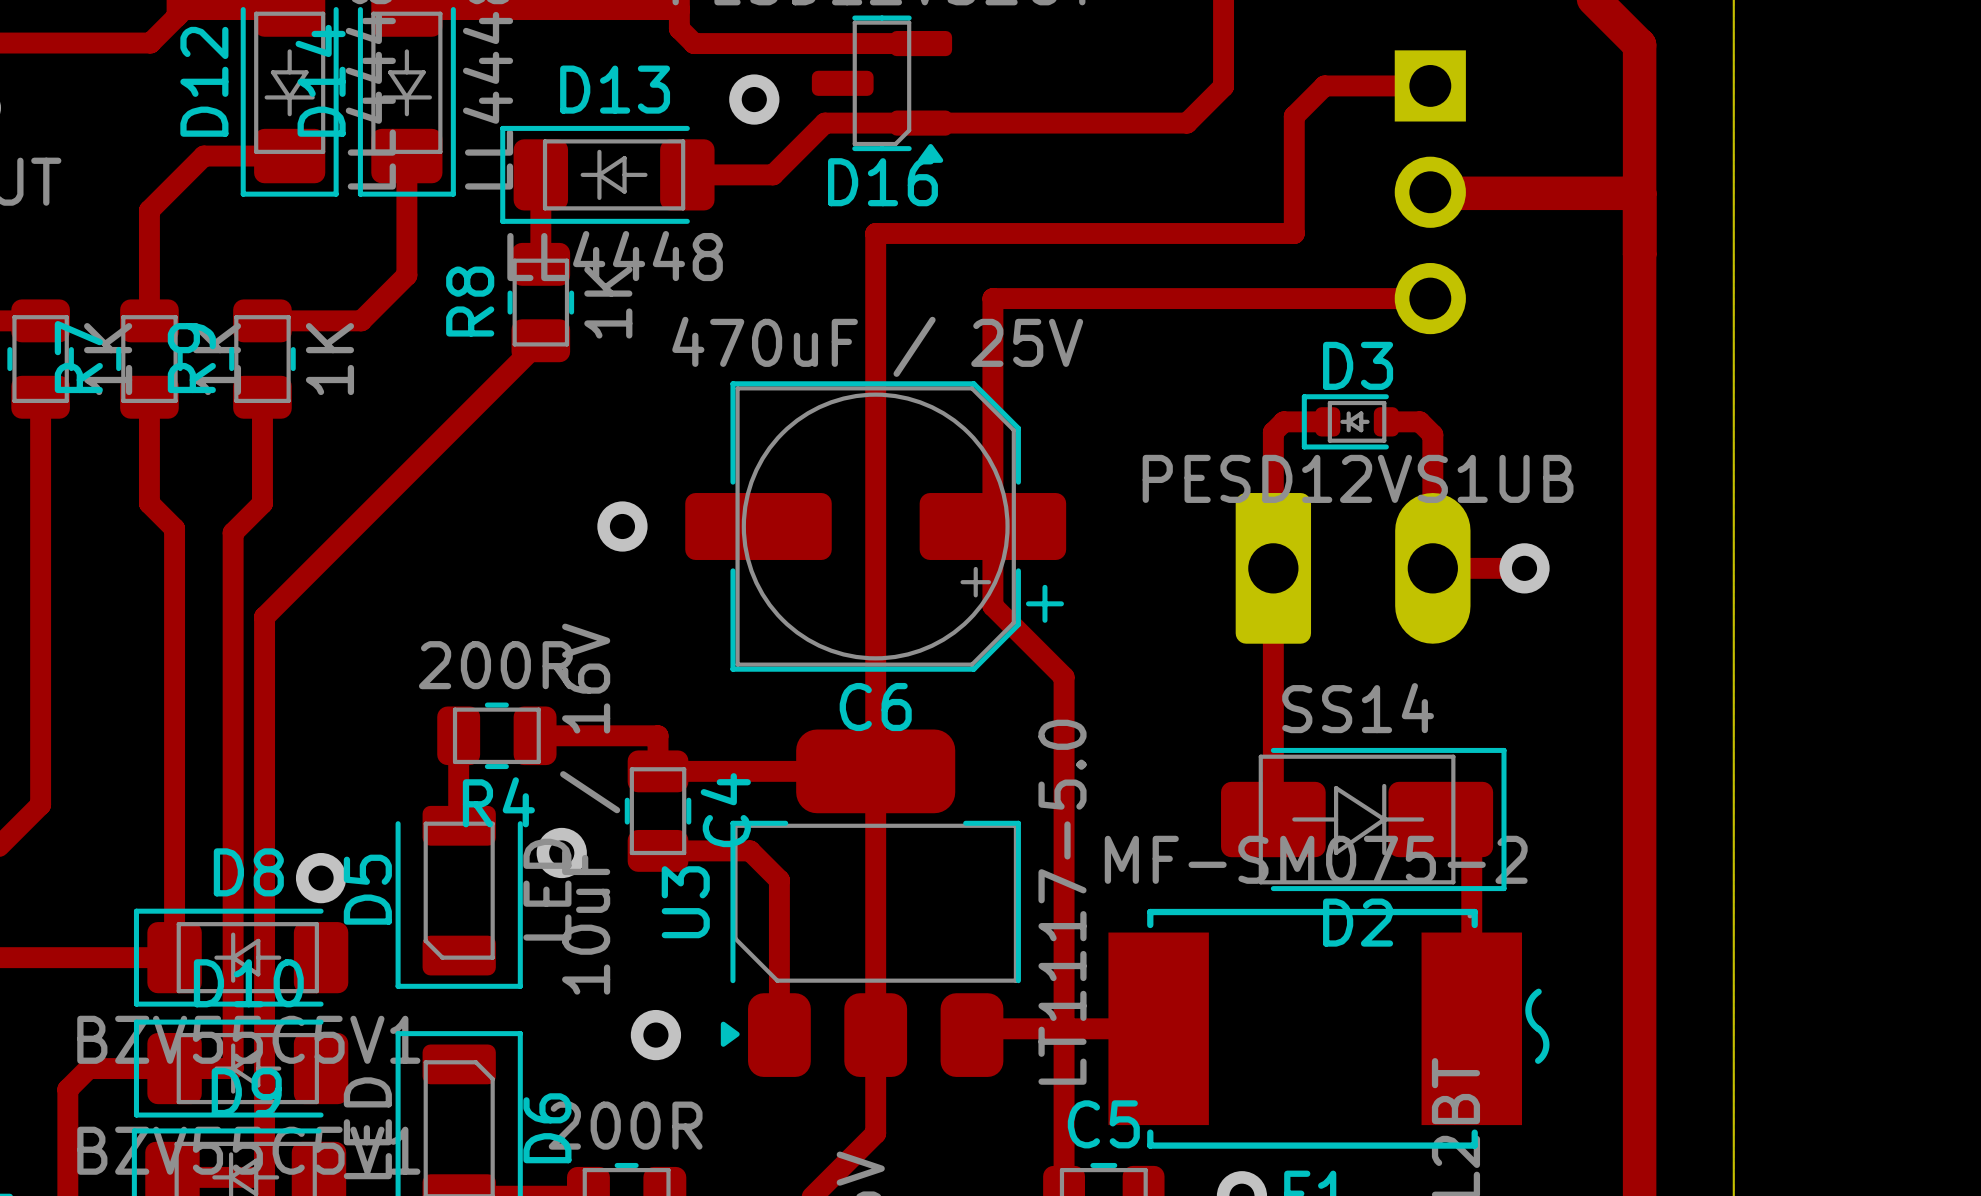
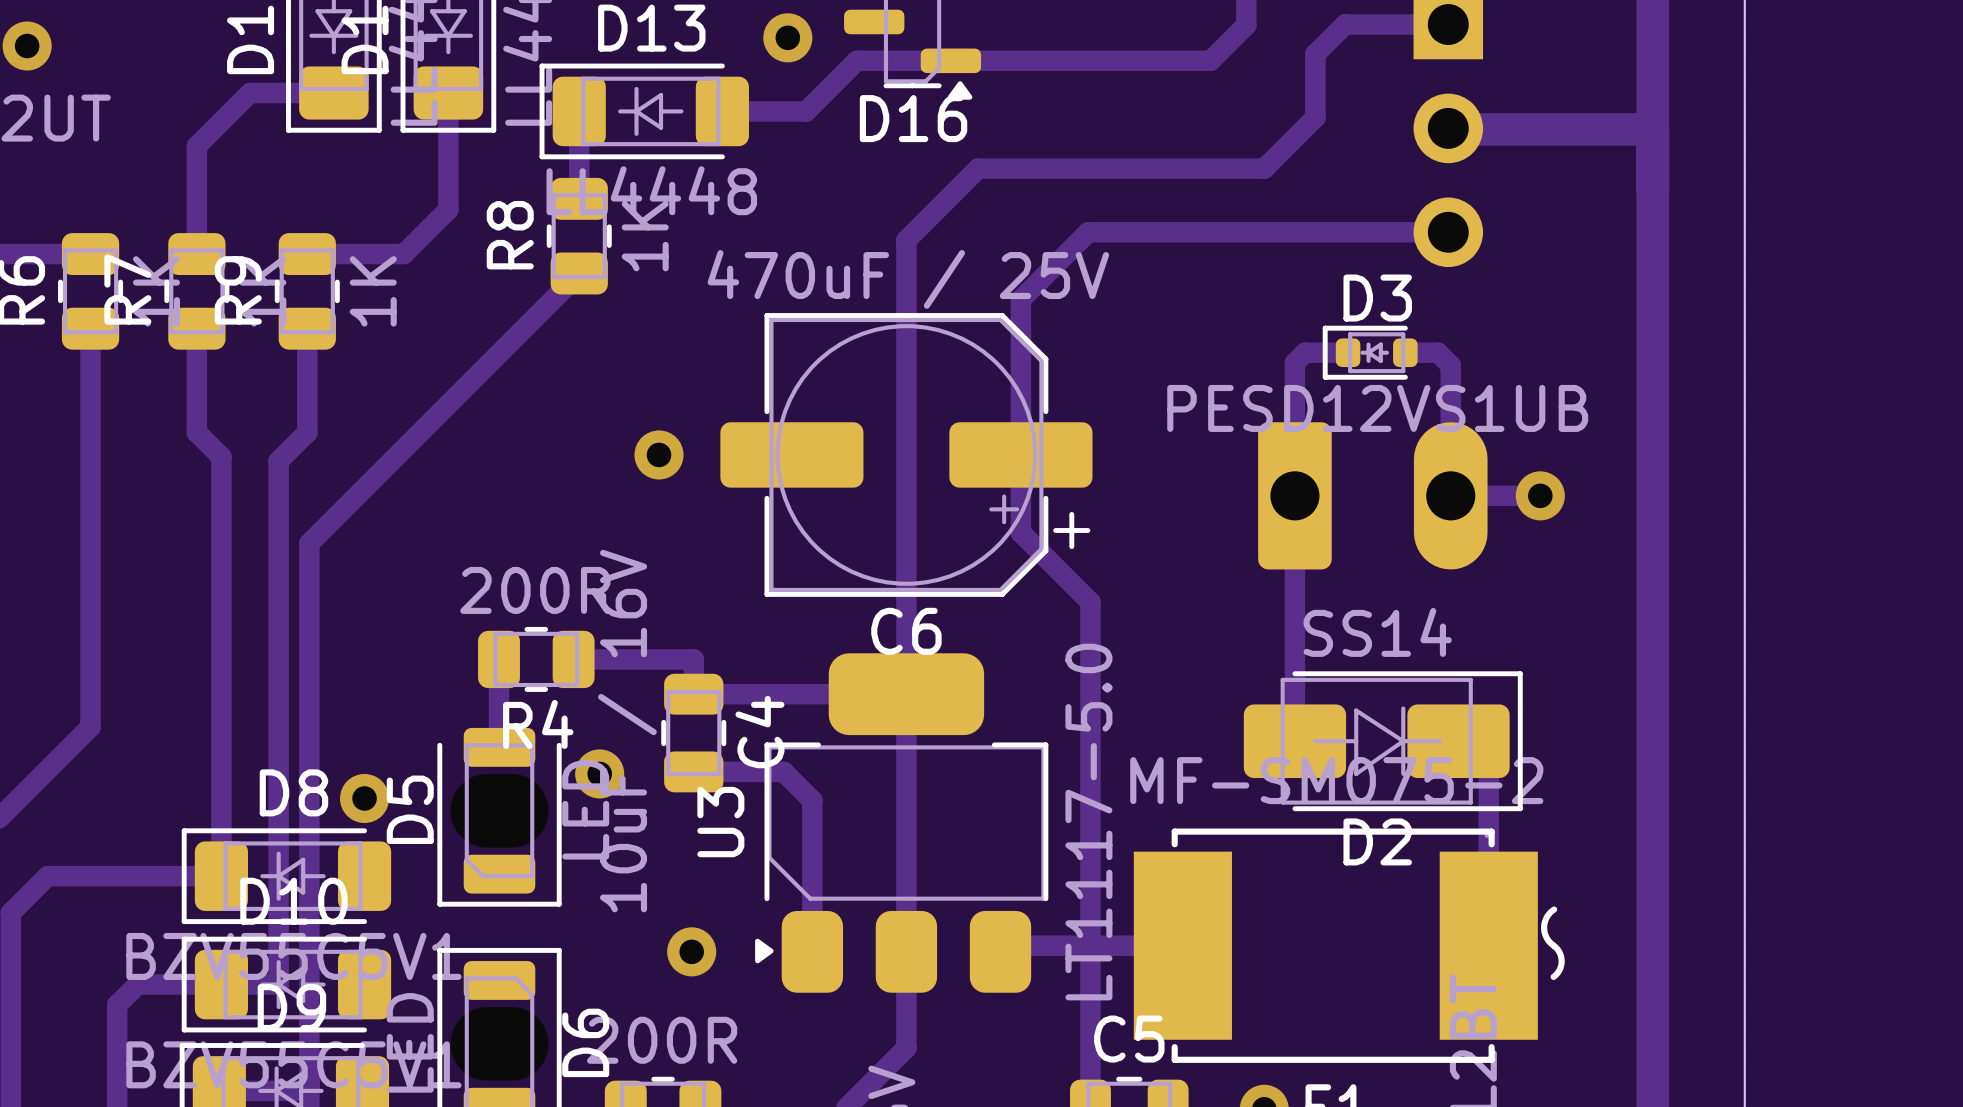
track: (1294, 181) (1294, 233) (1241, 233) -> (1315, 117) (1264, 168)
track: (948, 233) (875, 233) (875, 306) -> (977, 168) (906, 240)
track: (1061, 298) (992, 298) (992, 367) -> (1088, 232) (1020, 299)

